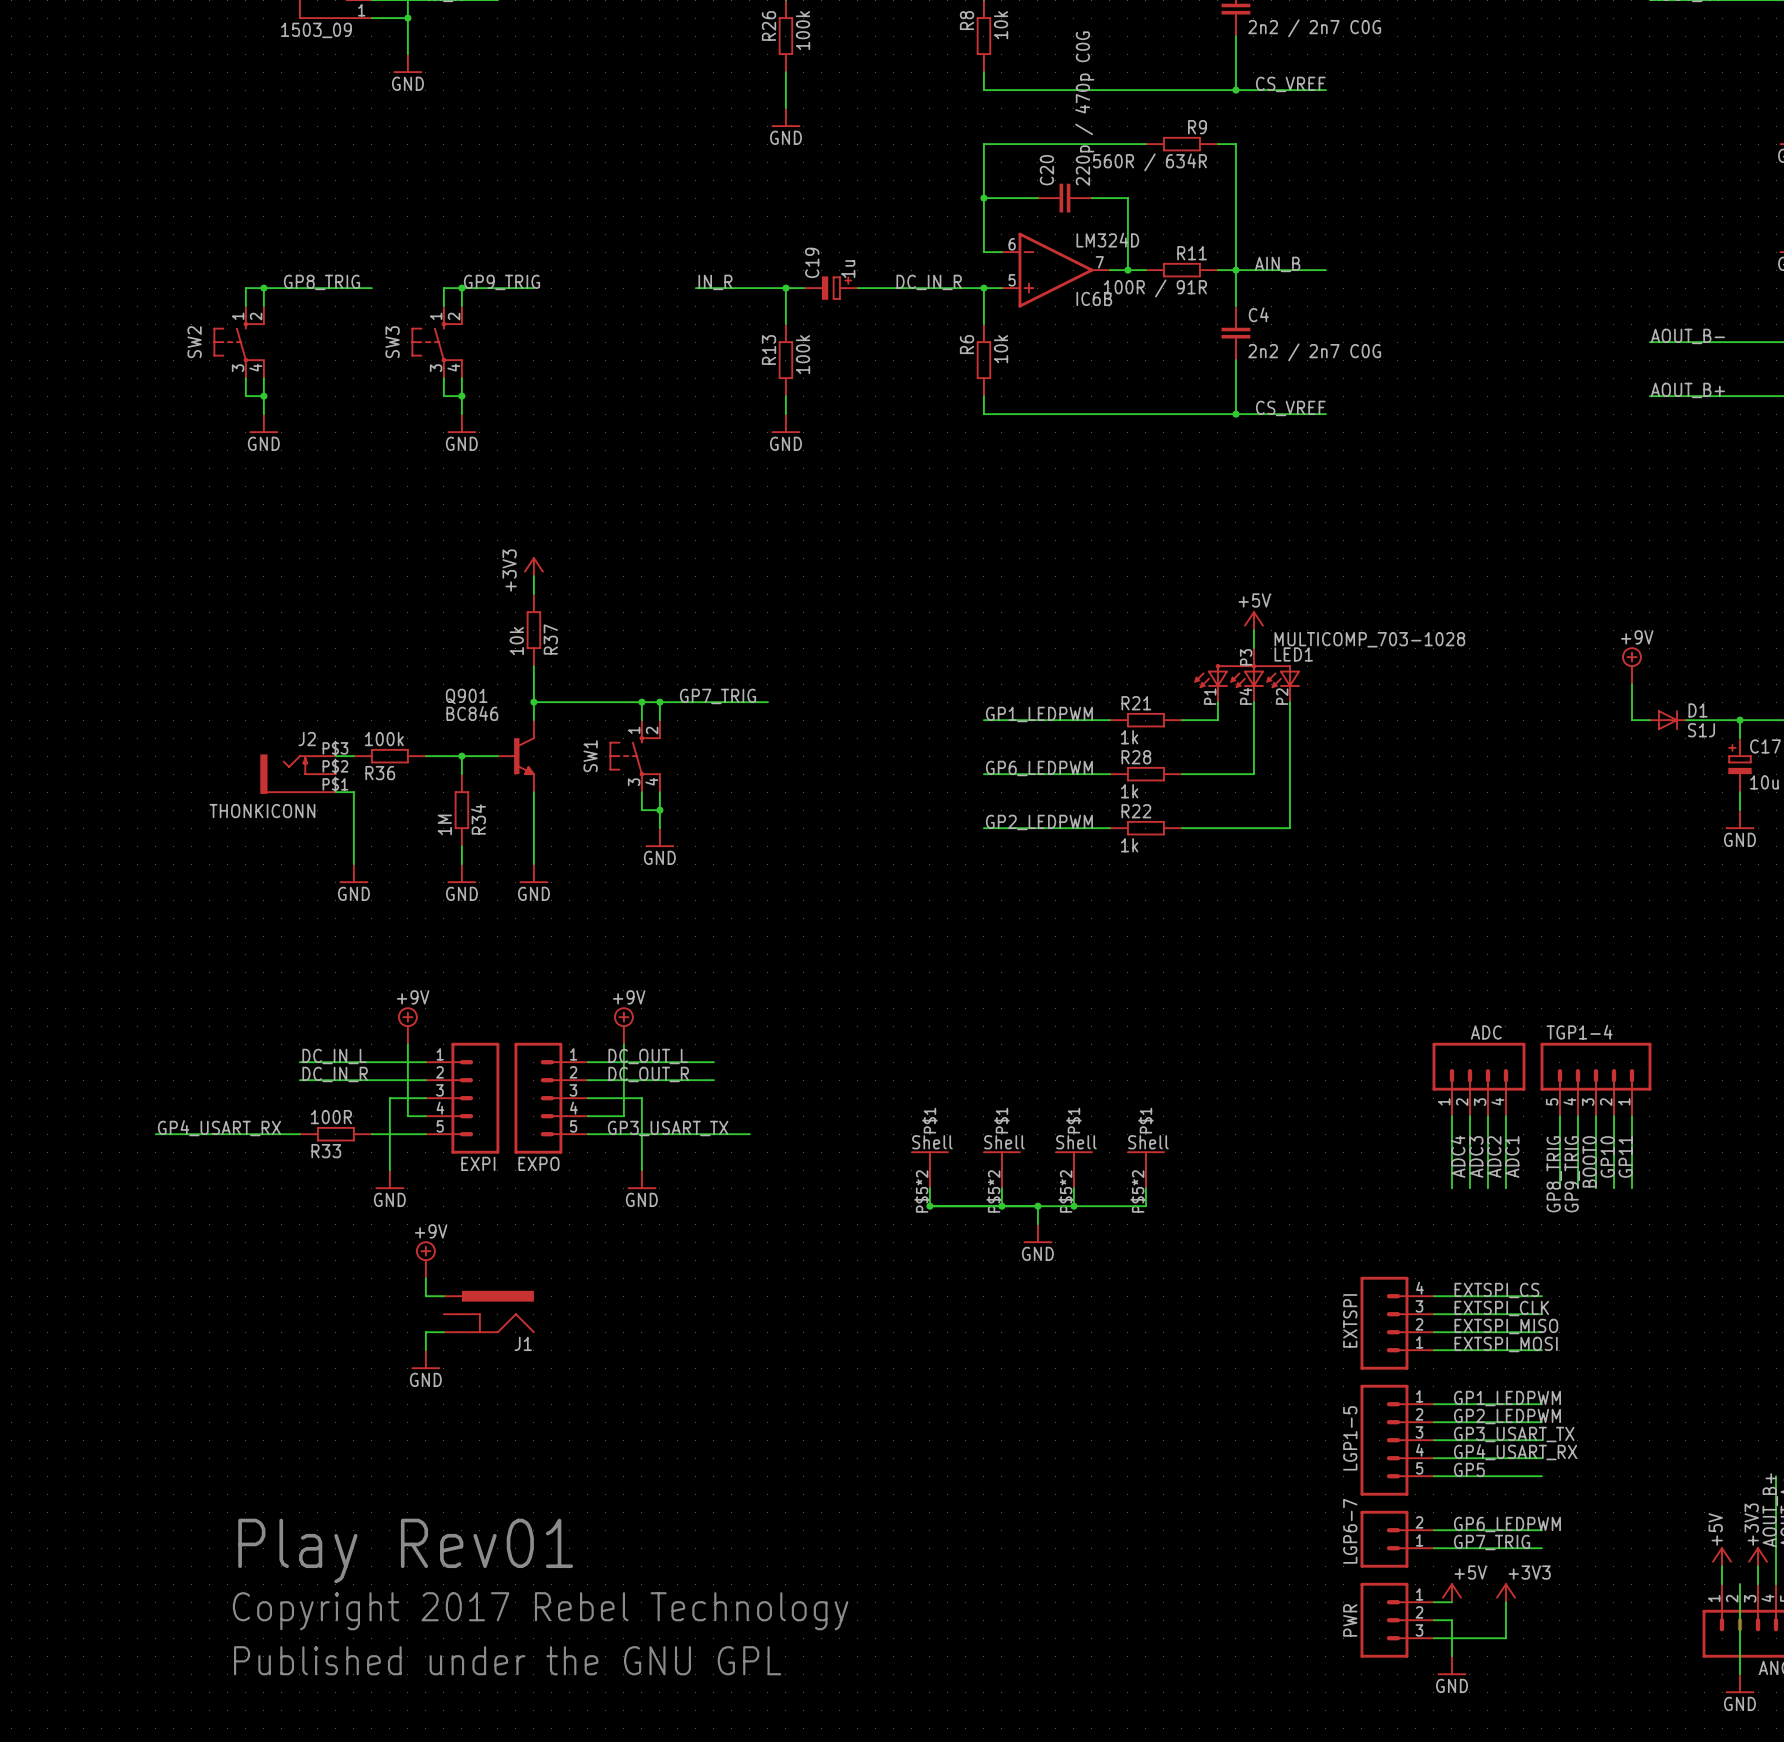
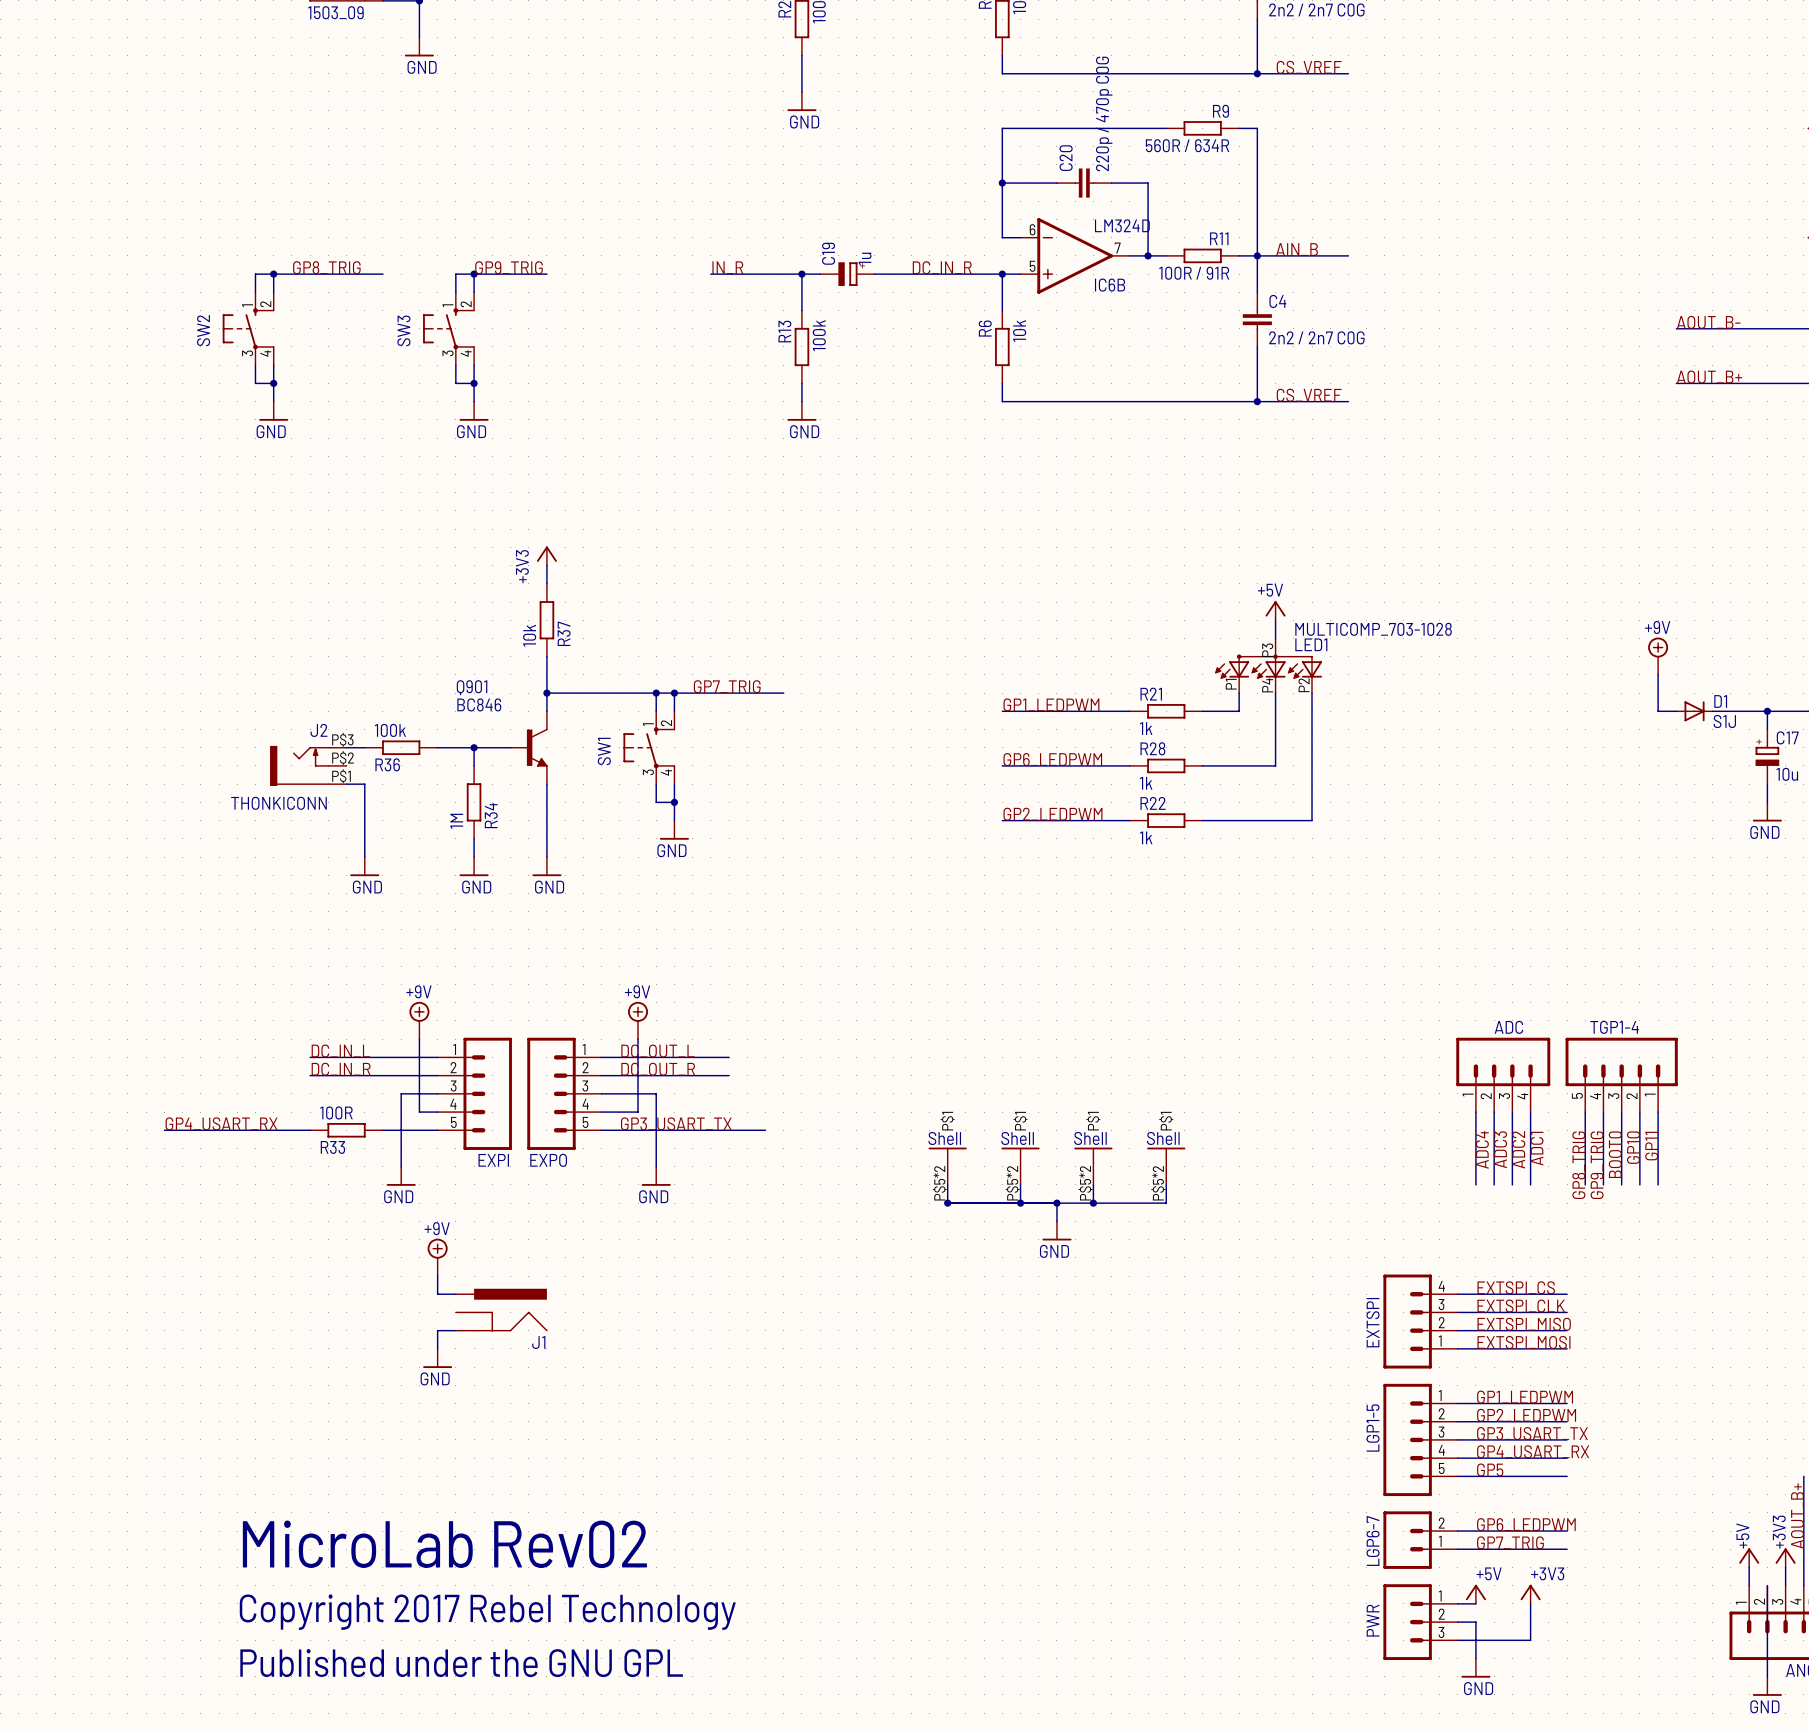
text: Play Rev01 (405, 1550) -> MicroLab Rev02 (444, 1544)

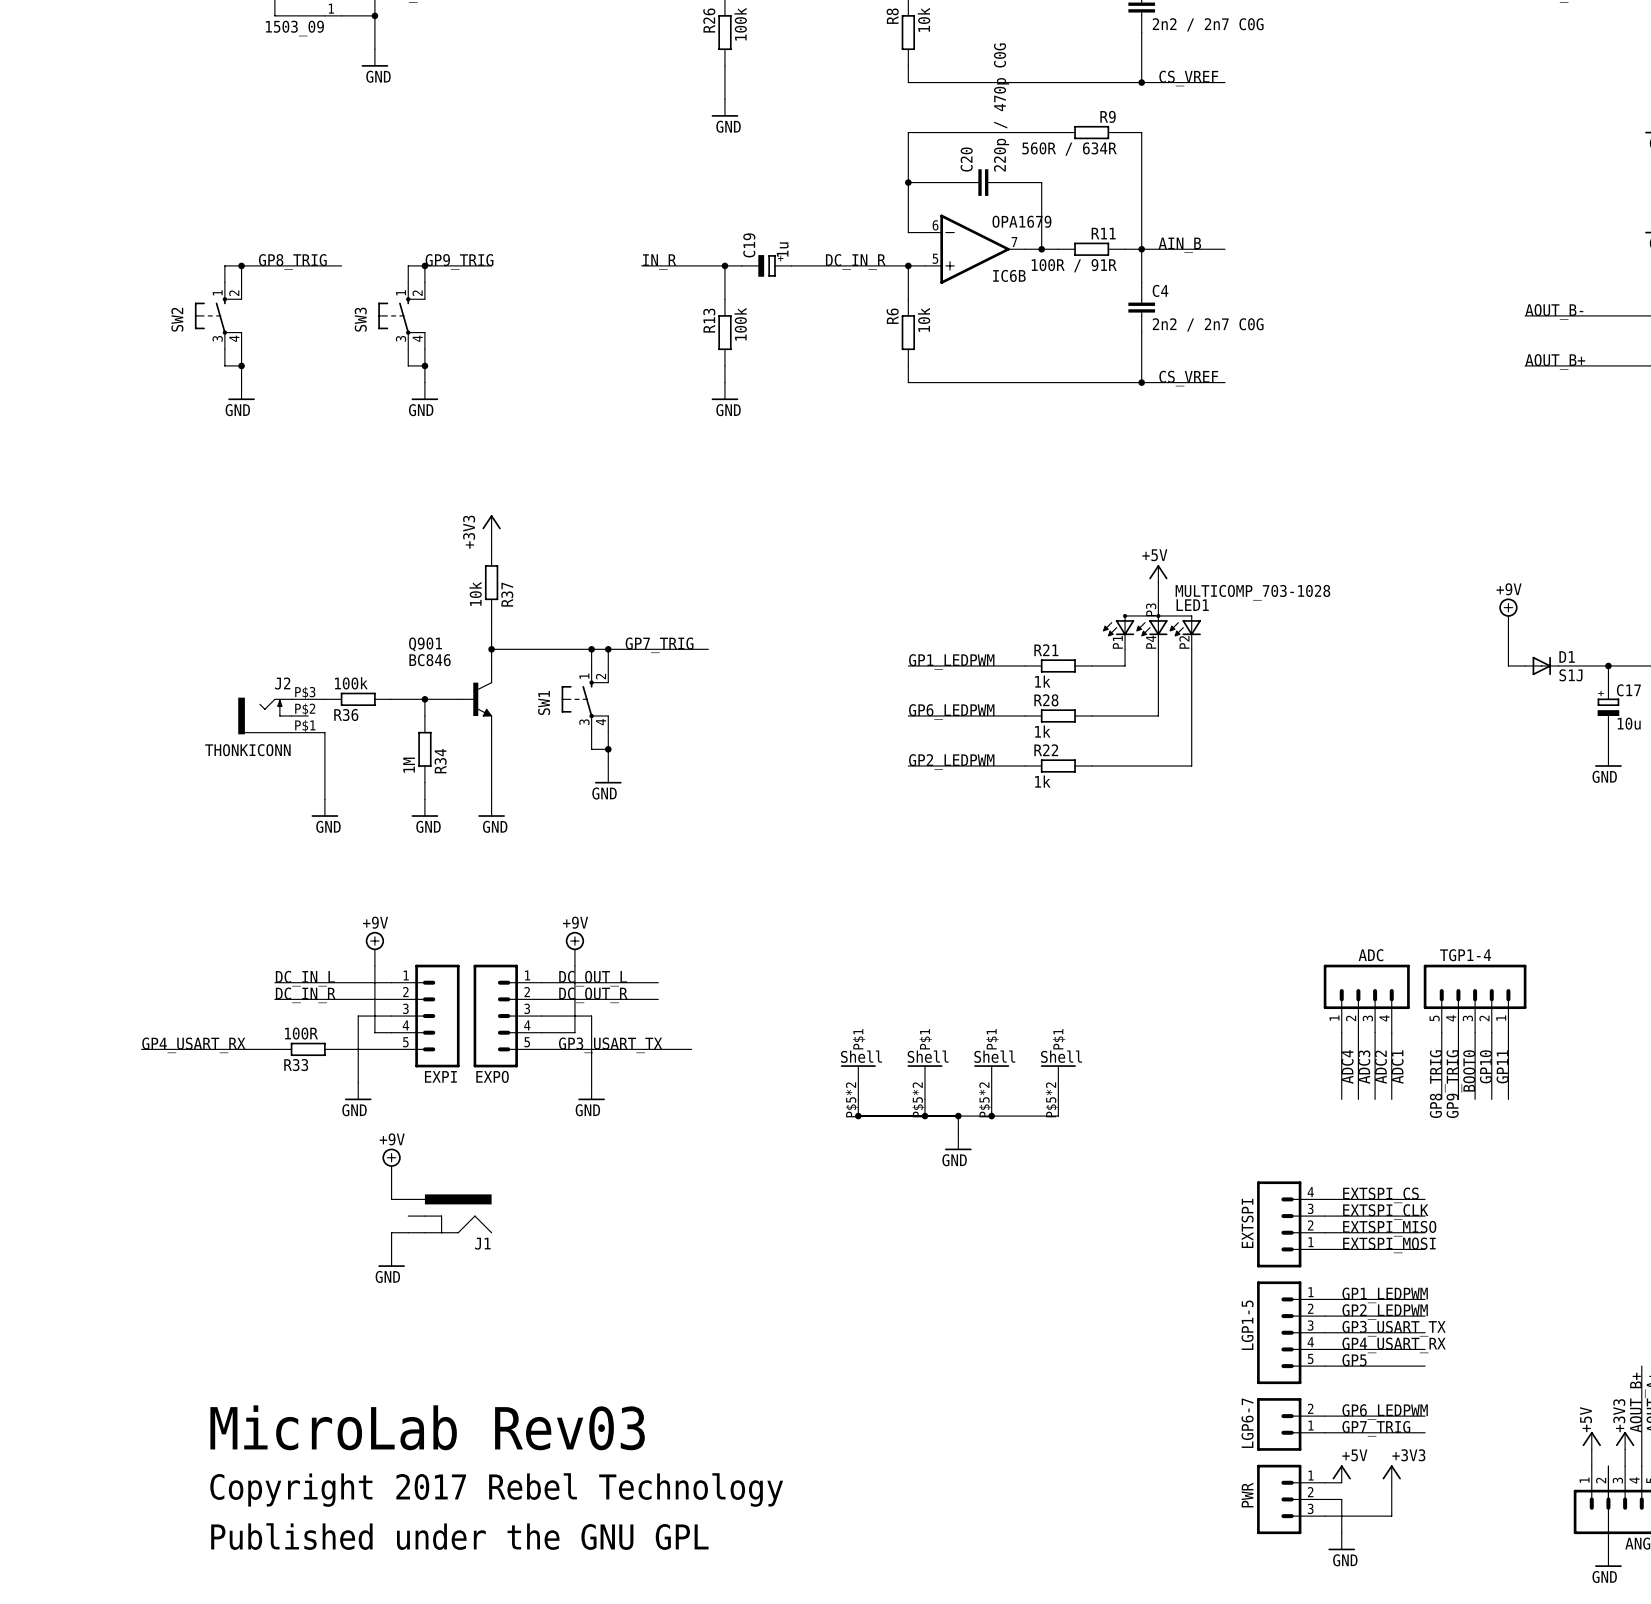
IC6B value: LM324D (1122, 225) -> OPA1679 (1021, 221)
text: MicroLab Rev02 (444, 1544) -> MicroLab Rev03 (427, 1427)

